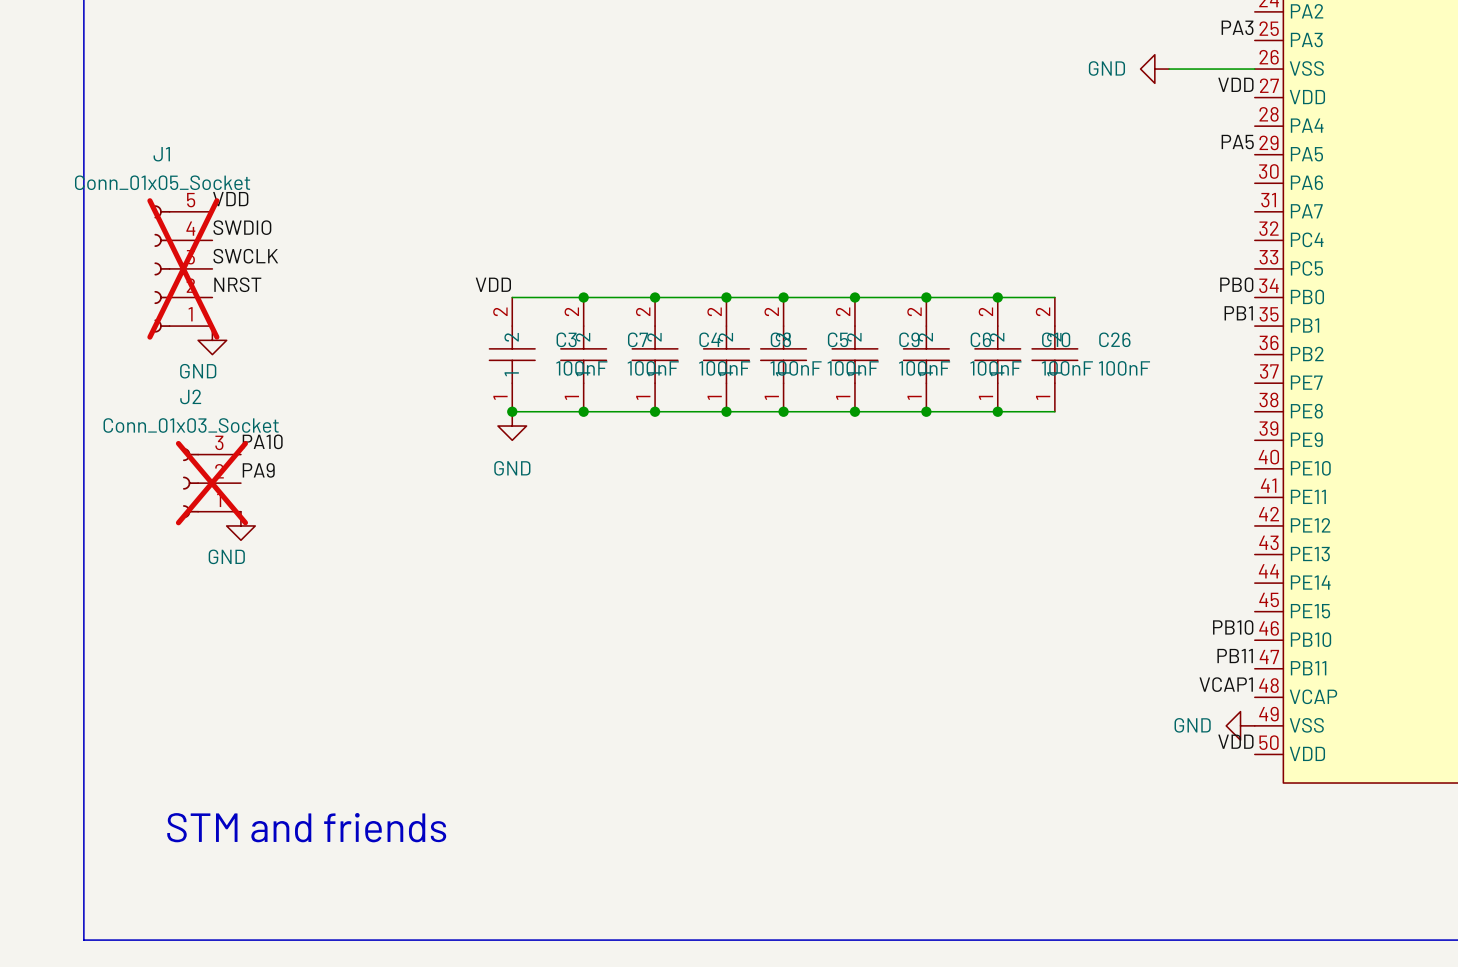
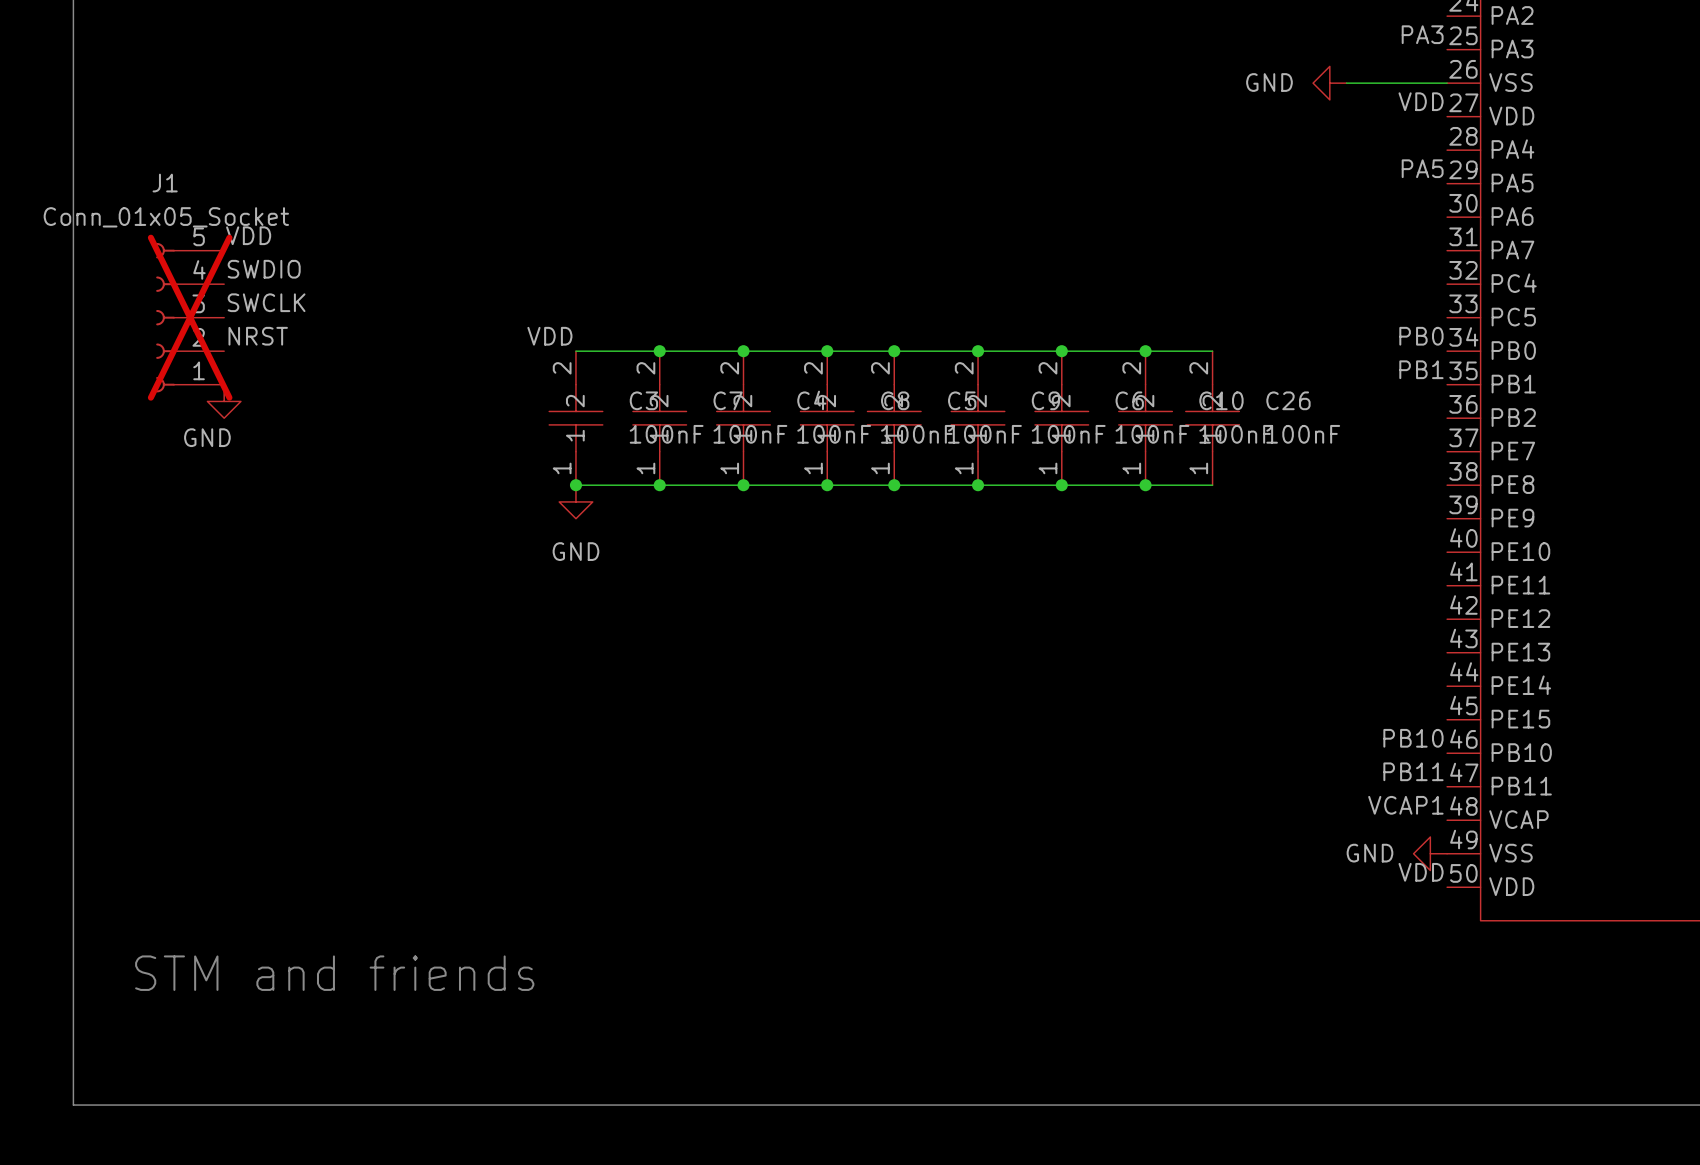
label: PA10 (262, 441) -> none
label: PA9 (258, 470) -> none
J2: Conn_01x03_Socket (211, 483) -> none
power symbol: GND (240, 525) -> none

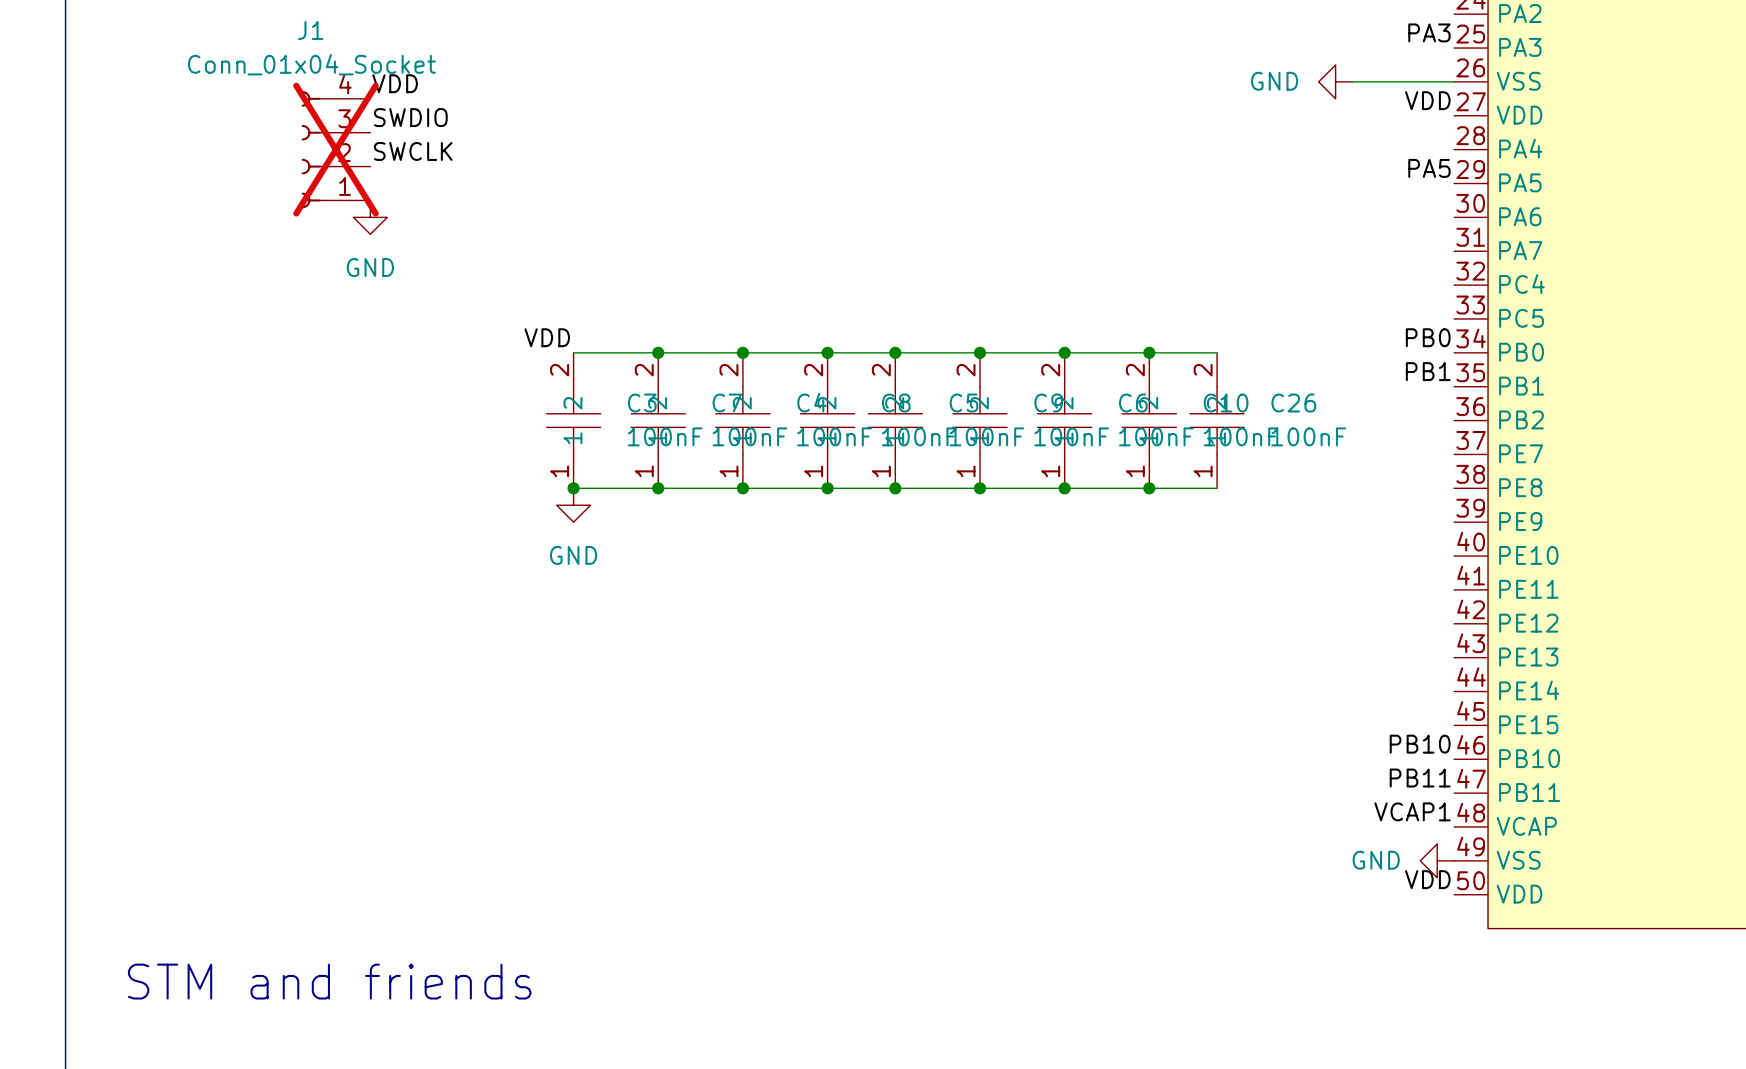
J1 value: Conn_01x05_Socket (166, 217) -> Conn_01x04_Socket (311, 64)
label position: VDD (248, 235) -> VDD (395, 83)
J1 symbol: [156, 242, 225, 393] -> [301, 91, 371, 209]
label position: SWDIO (264, 269) -> SWDIO (410, 117)
label position: SWCLK (266, 302) -> SWCLK (413, 151)
label: NRST (258, 336) -> none
power symbol position: GND (224, 401) -> GND (370, 217)
power symbol text position: GND (207, 437) -> GND (370, 267)

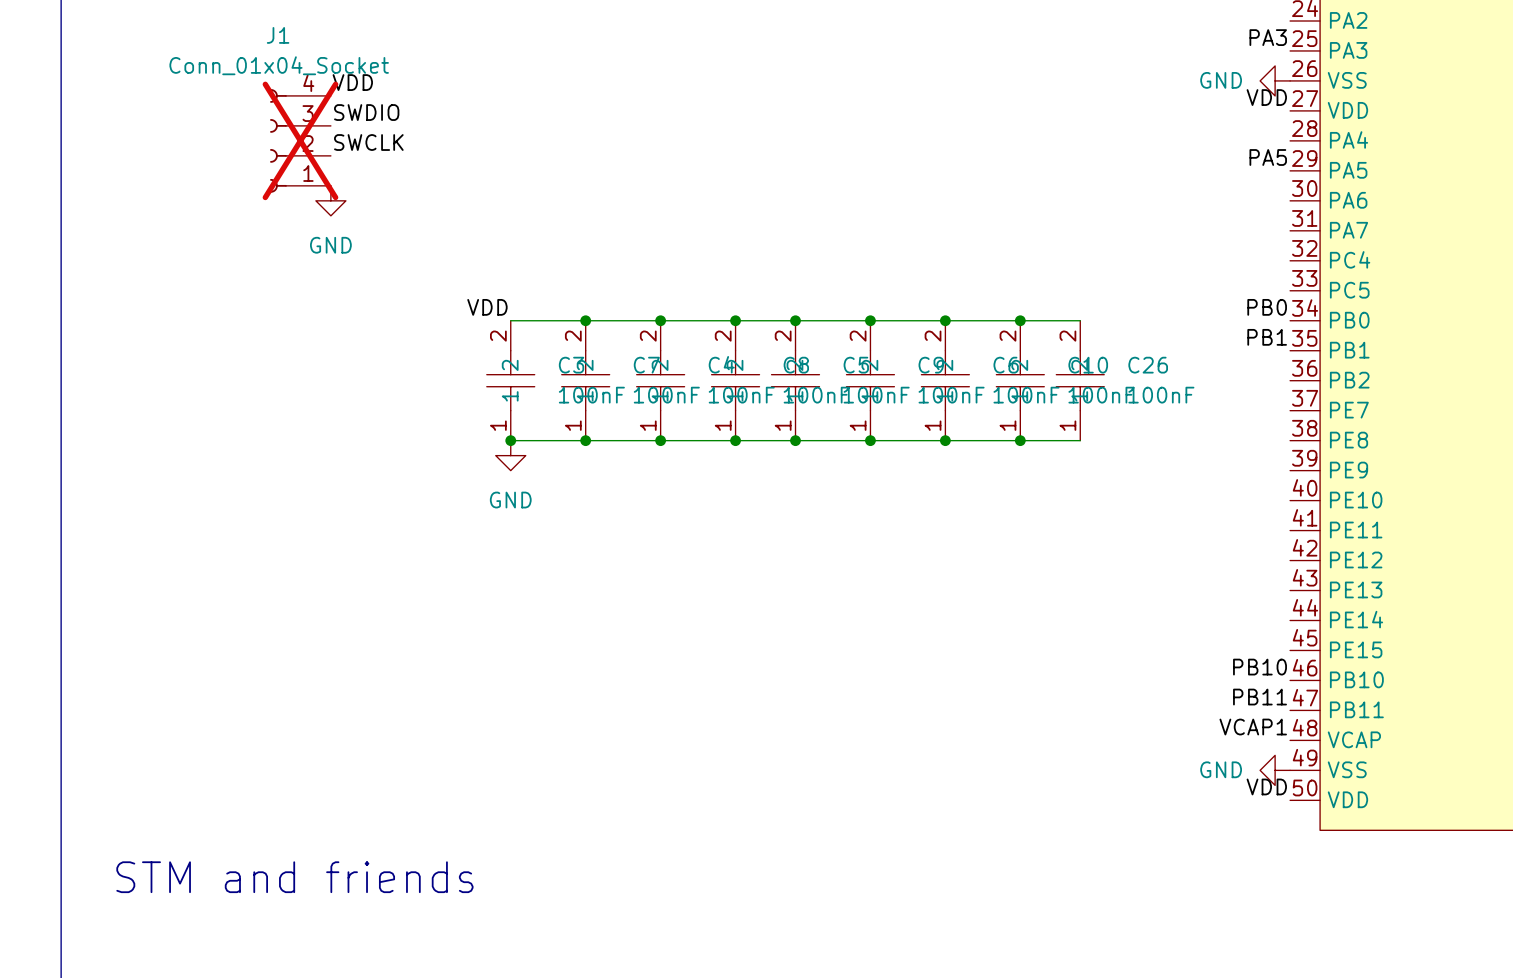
power symbol position: GND (1335, 81) -> GND (1275, 80)
wire: (1352, 81) (1454, 81) -> none

